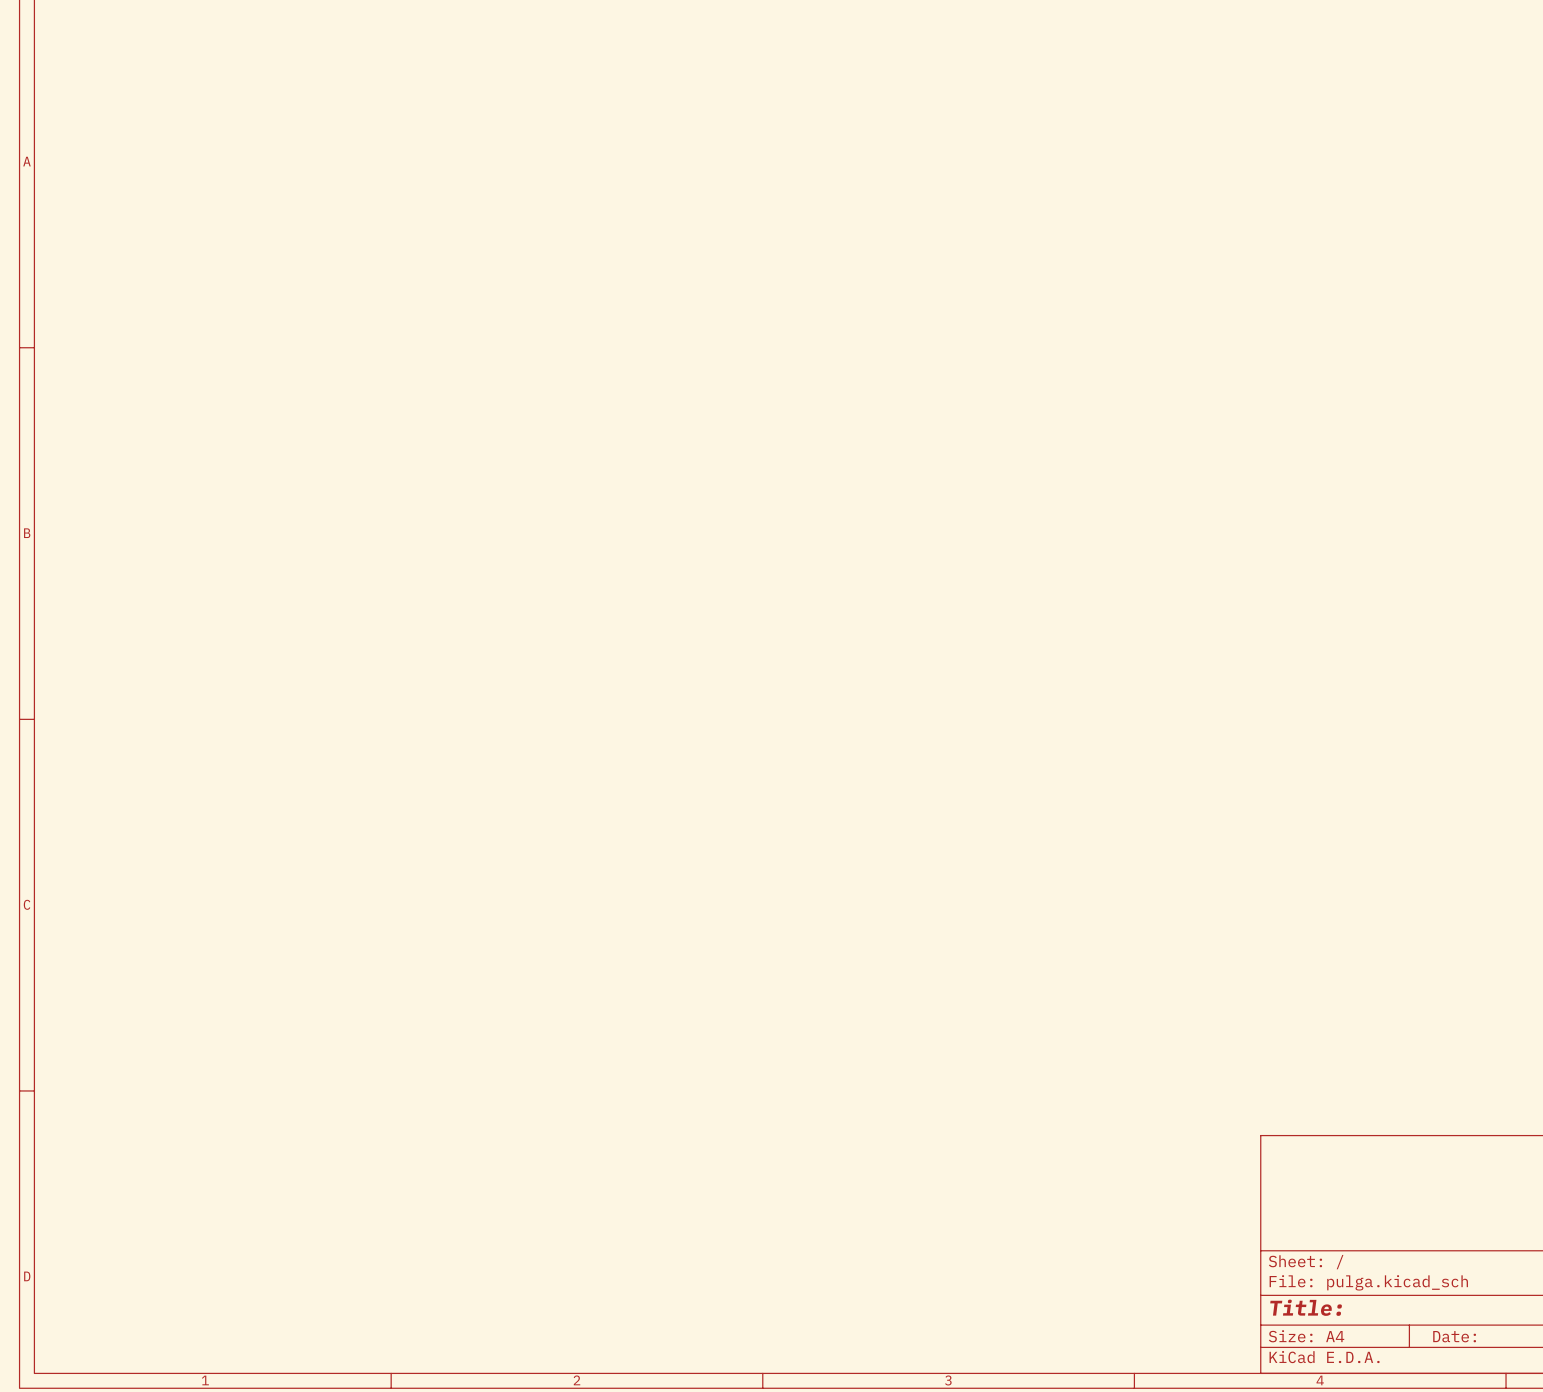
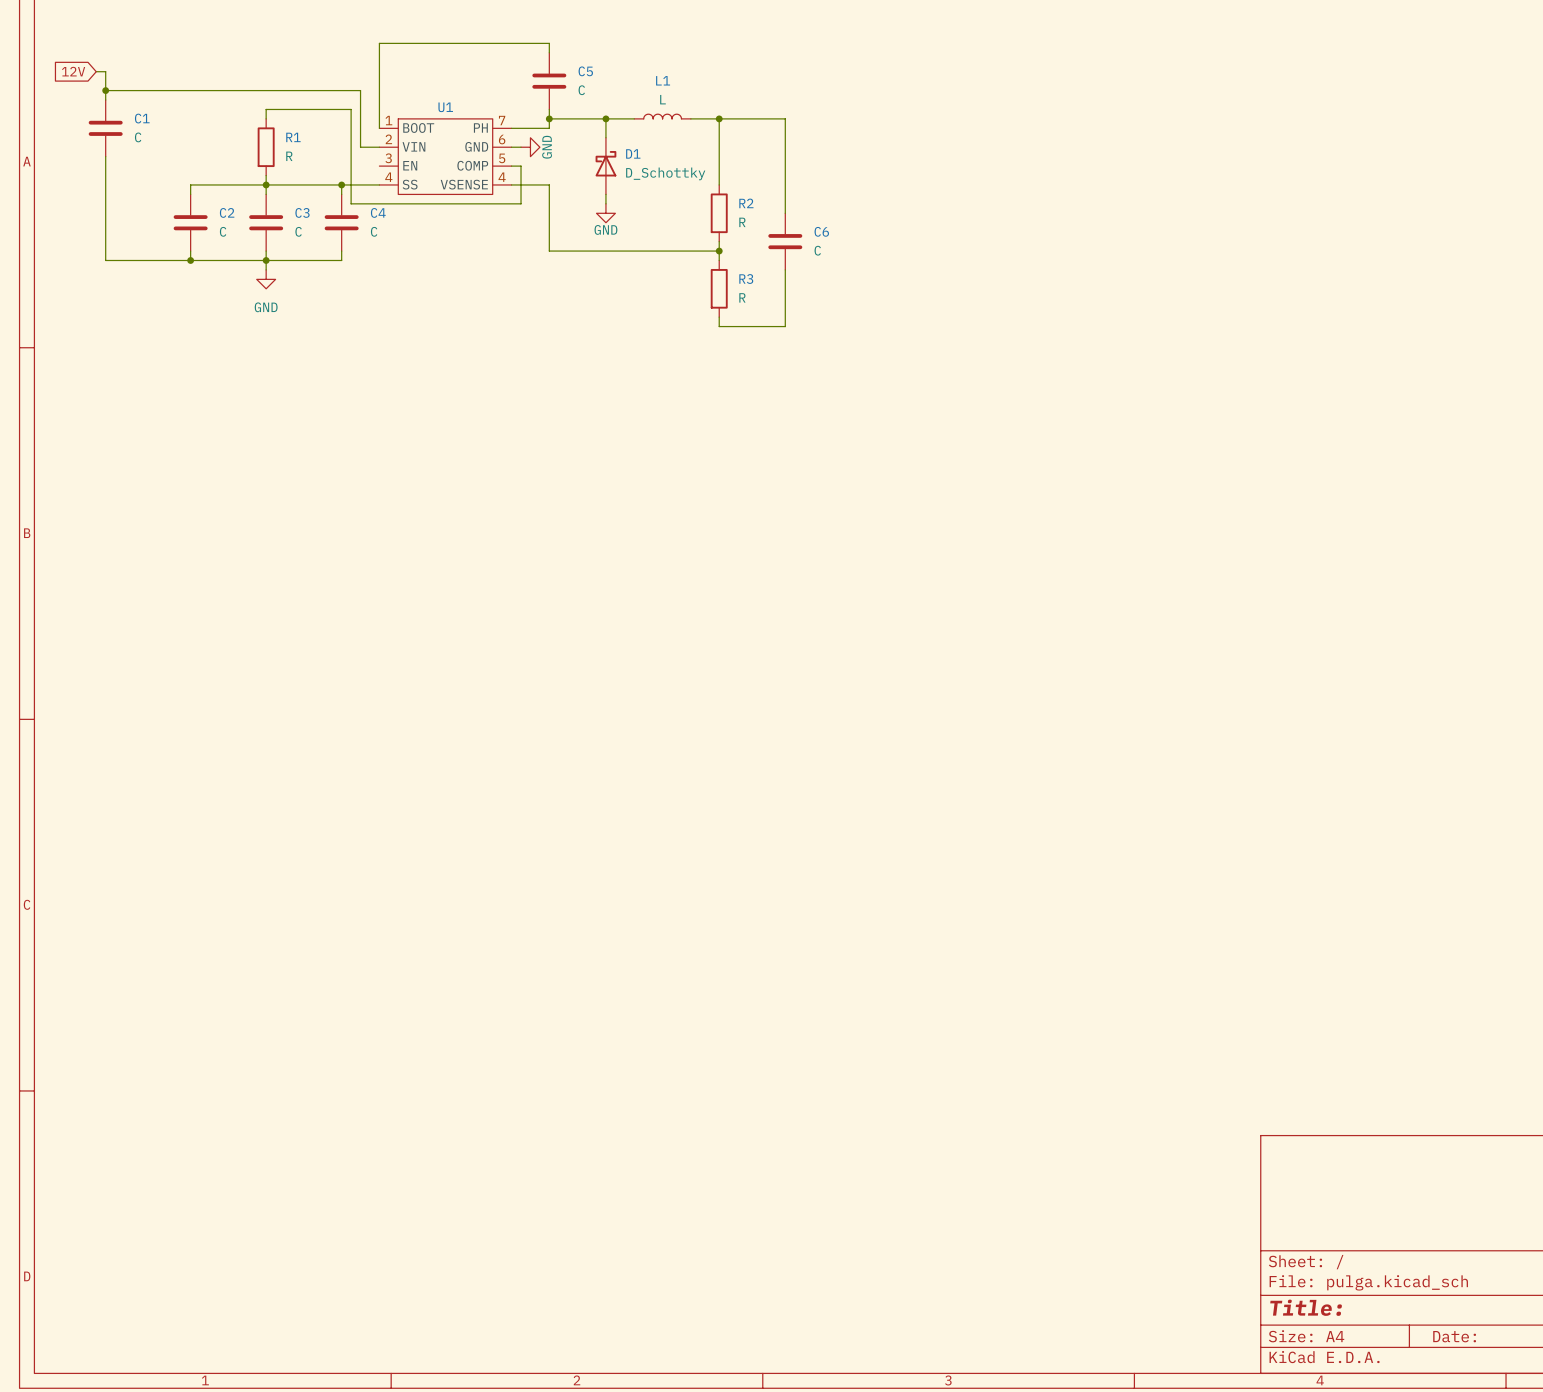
wire: none -> (549, 52) (549, 43) (379, 43) (379, 128)
global label: none -> 12V (73, 71)
wire: none -> (96, 71) (105, 71) (105, 100)
C5: none -> C (549, 81)
wire: none -> (105, 90) (360, 90) (360, 147) (379, 147)
junction: none -> (105, 90)
wire: none -> (549, 109) (549, 128) (511, 128)
L1: none -> L (662, 116)
wire: none -> (266, 118) (266, 109) (351, 109) (351, 203) (521, 203) (521, 166) (511, 166)
wire: none -> (549, 118) (634, 118)
junction: none -> (549, 118)
wire: none -> (605, 118) (605, 137)
junction: none -> (605, 118)
wire: none -> (690, 118) (785, 118) (785, 213)
wire: none -> (719, 118) (719, 184)
junction: none -> (719, 118)
C1: none -> C (105, 128)
R1: none -> R (266, 147)
wire: none -> (511, 147) (521, 147)
power symbol: none -> GND (530, 147)
wire: none -> (105, 156) (105, 260) (341, 260) (341, 251)
U1: none -> (445, 156)
D1: none -> D_Schottky (605, 166)
wire: none -> (266, 175) (266, 194)
junction: none -> (266, 184)
wire: none -> (341, 184) (341, 194)
junction: none -> (341, 184)
wire: none -> (379, 184) (190, 184) (190, 194)
wire: none -> (511, 184) (549, 184) (549, 251) (719, 251)
wire: none -> (605, 194) (605, 203)
power symbol: none -> GND (605, 213)
R2: none -> R (719, 213)
C2: none -> C (190, 222)
C3: none -> C (266, 222)
C4: none -> C (341, 222)
wire: none -> (719, 241) (719, 260)
C6: none -> C (785, 241)
wire: none -> (190, 251) (190, 260)
wire: none -> (266, 251) (266, 269)
junction: none -> (719, 251)
junction: none -> (190, 260)
junction: none -> (266, 260)
wire: none -> (785, 269) (785, 326) (719, 326) (719, 317)
power symbol: none -> GND (266, 279)
R3: none -> R (719, 288)

